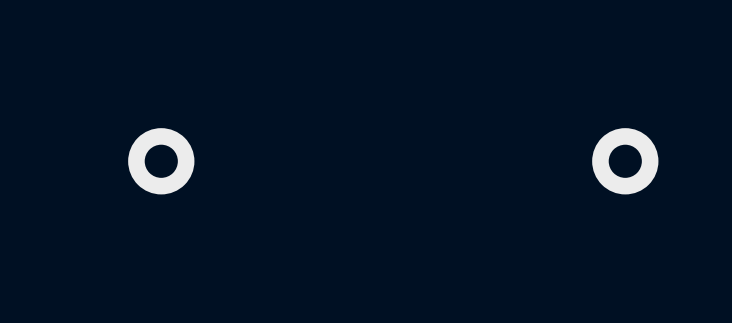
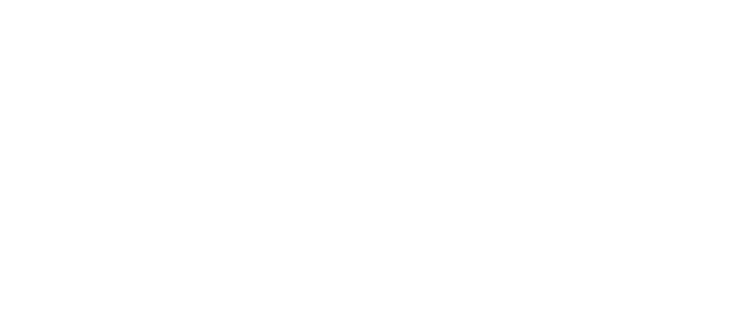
via: (161, 161) -> none
via: (625, 161) -> none

